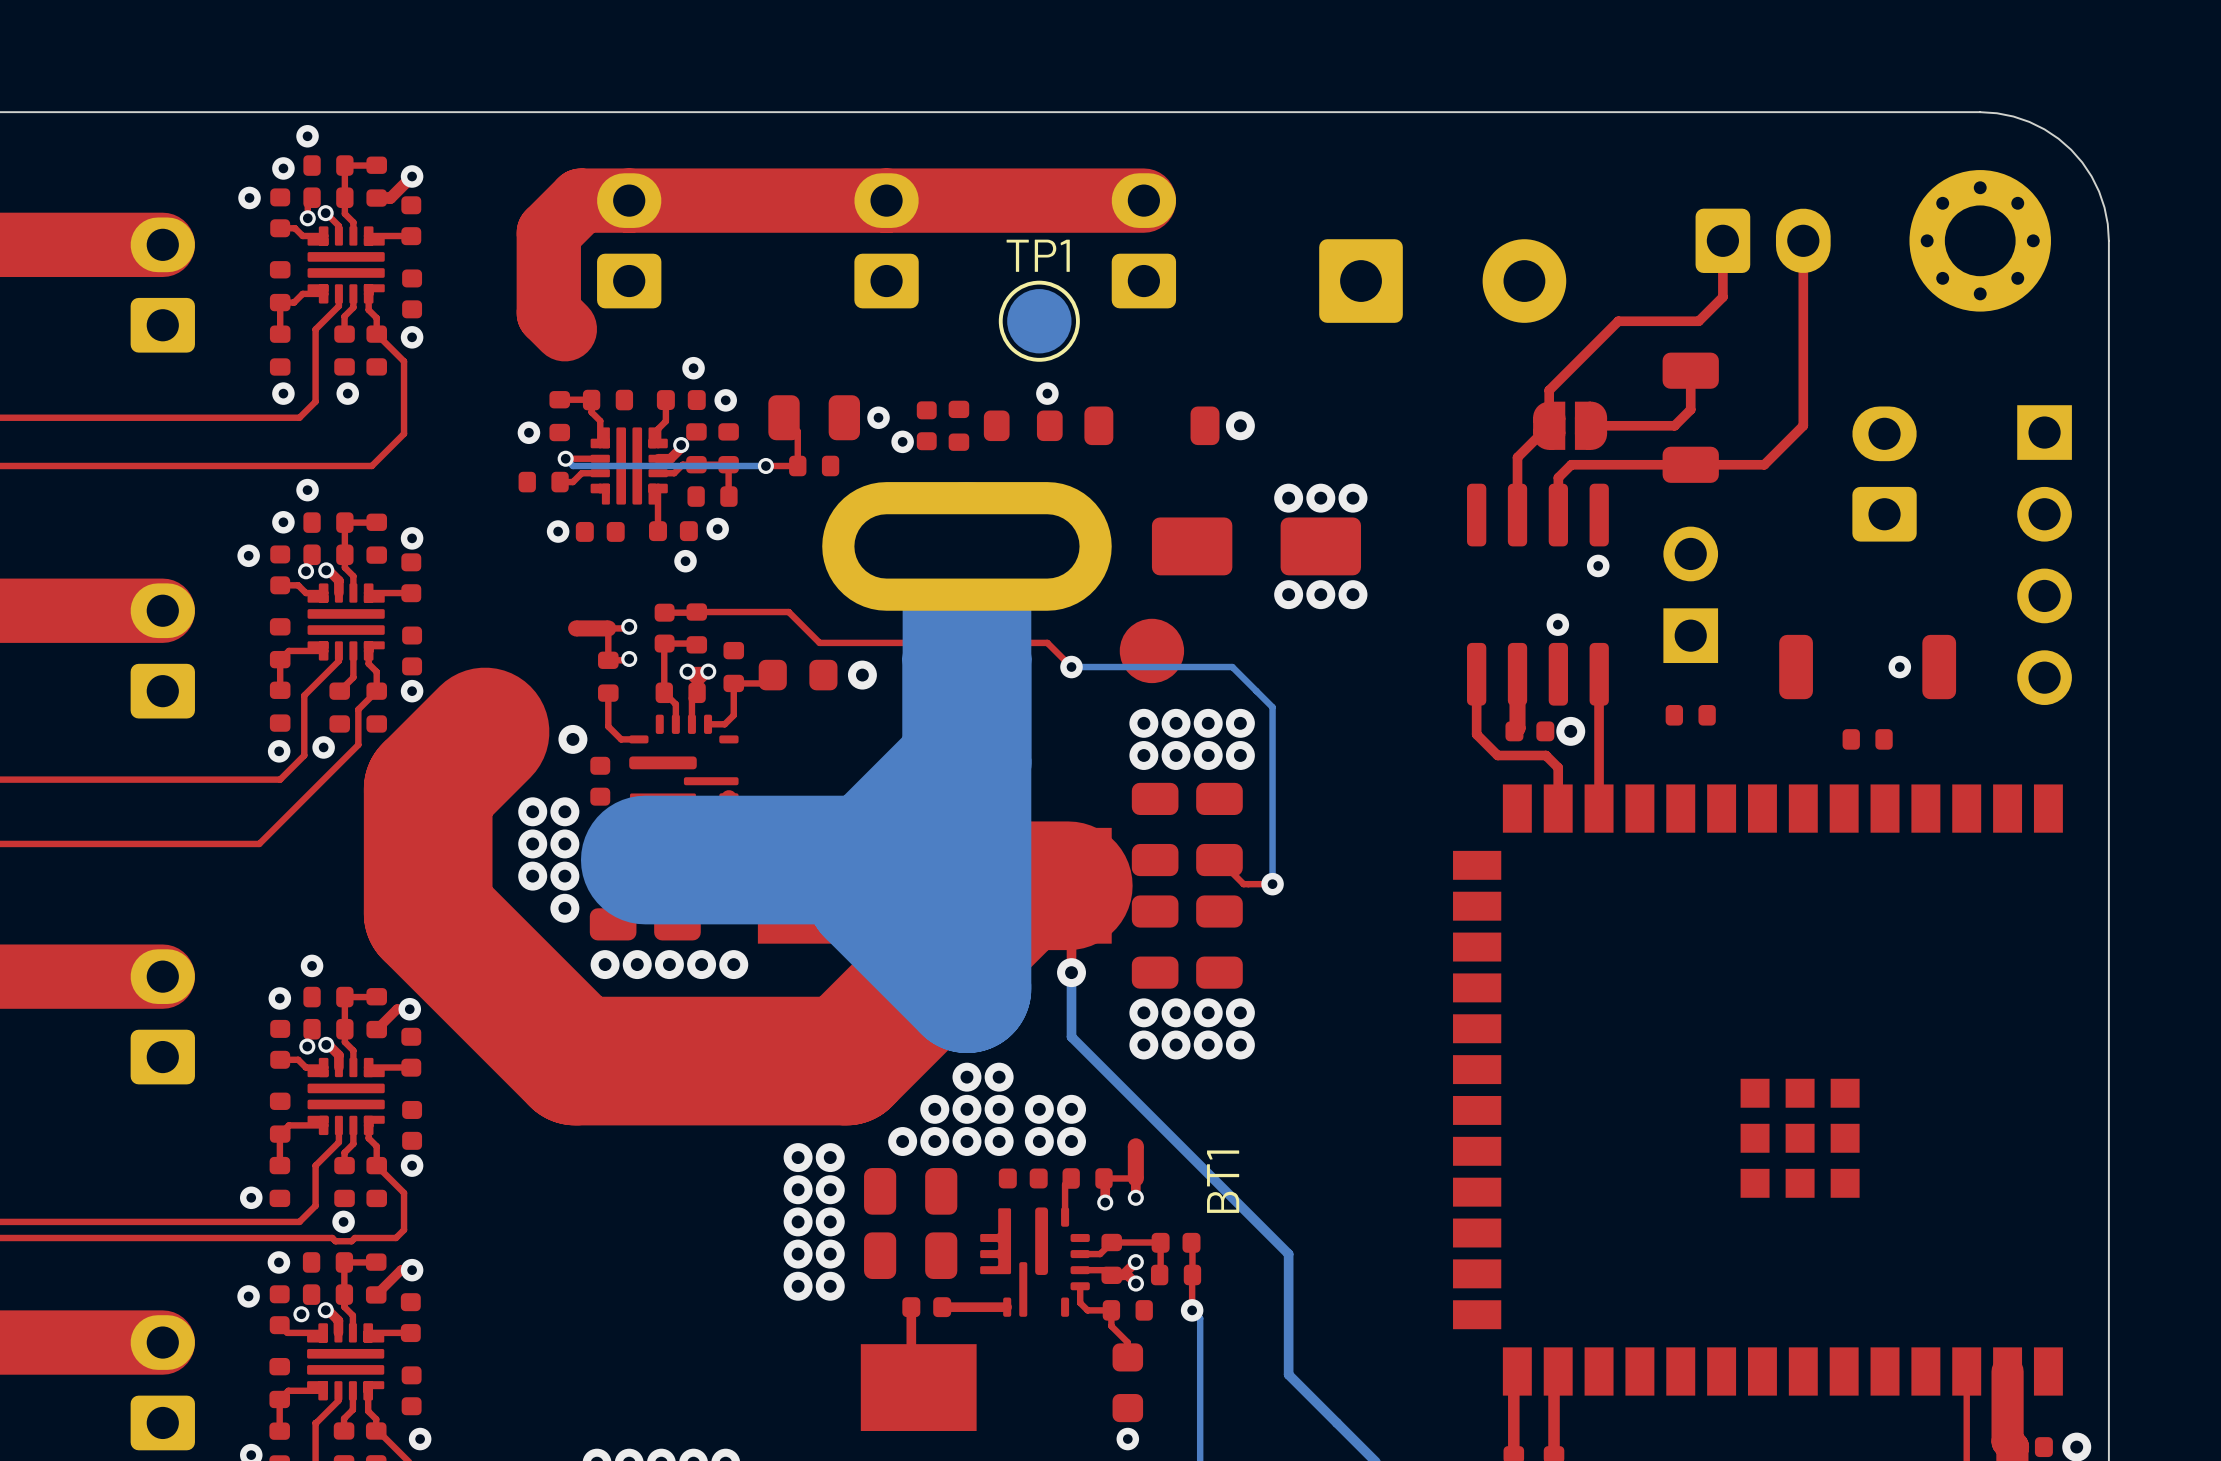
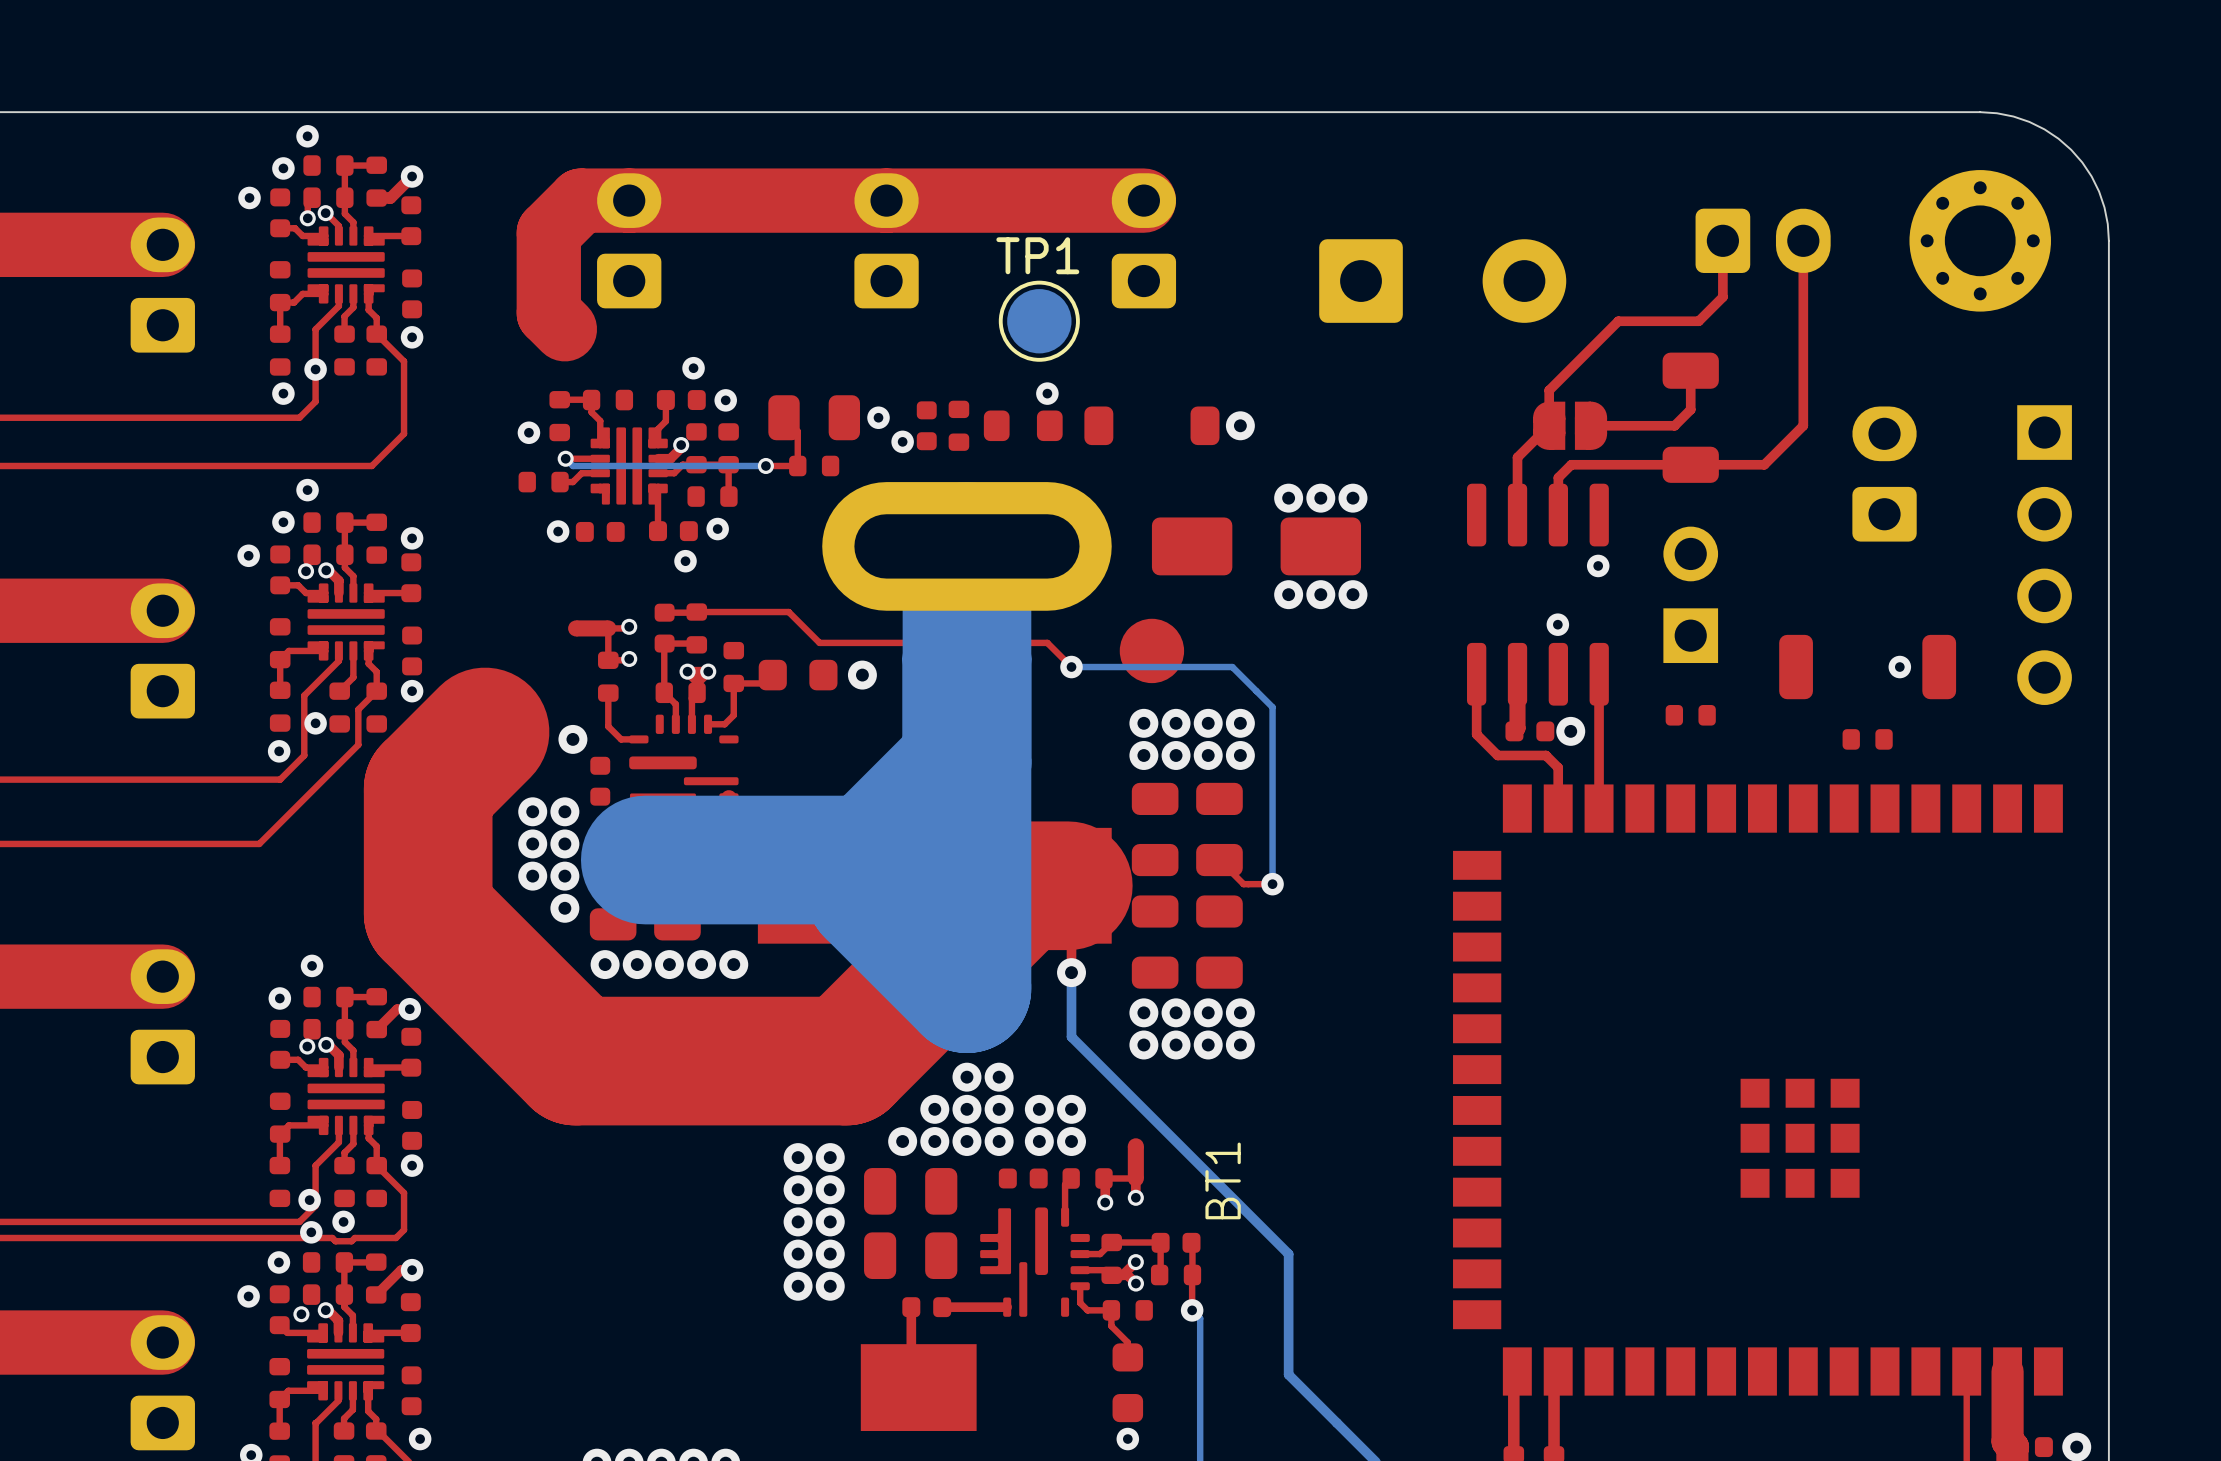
via position: (347, 393) -> (315, 369)
via position: (323, 747) -> (315, 723)
via: (251, 1197) -> none
via: none -> (309, 1200)
via: none -> (311, 1232)

